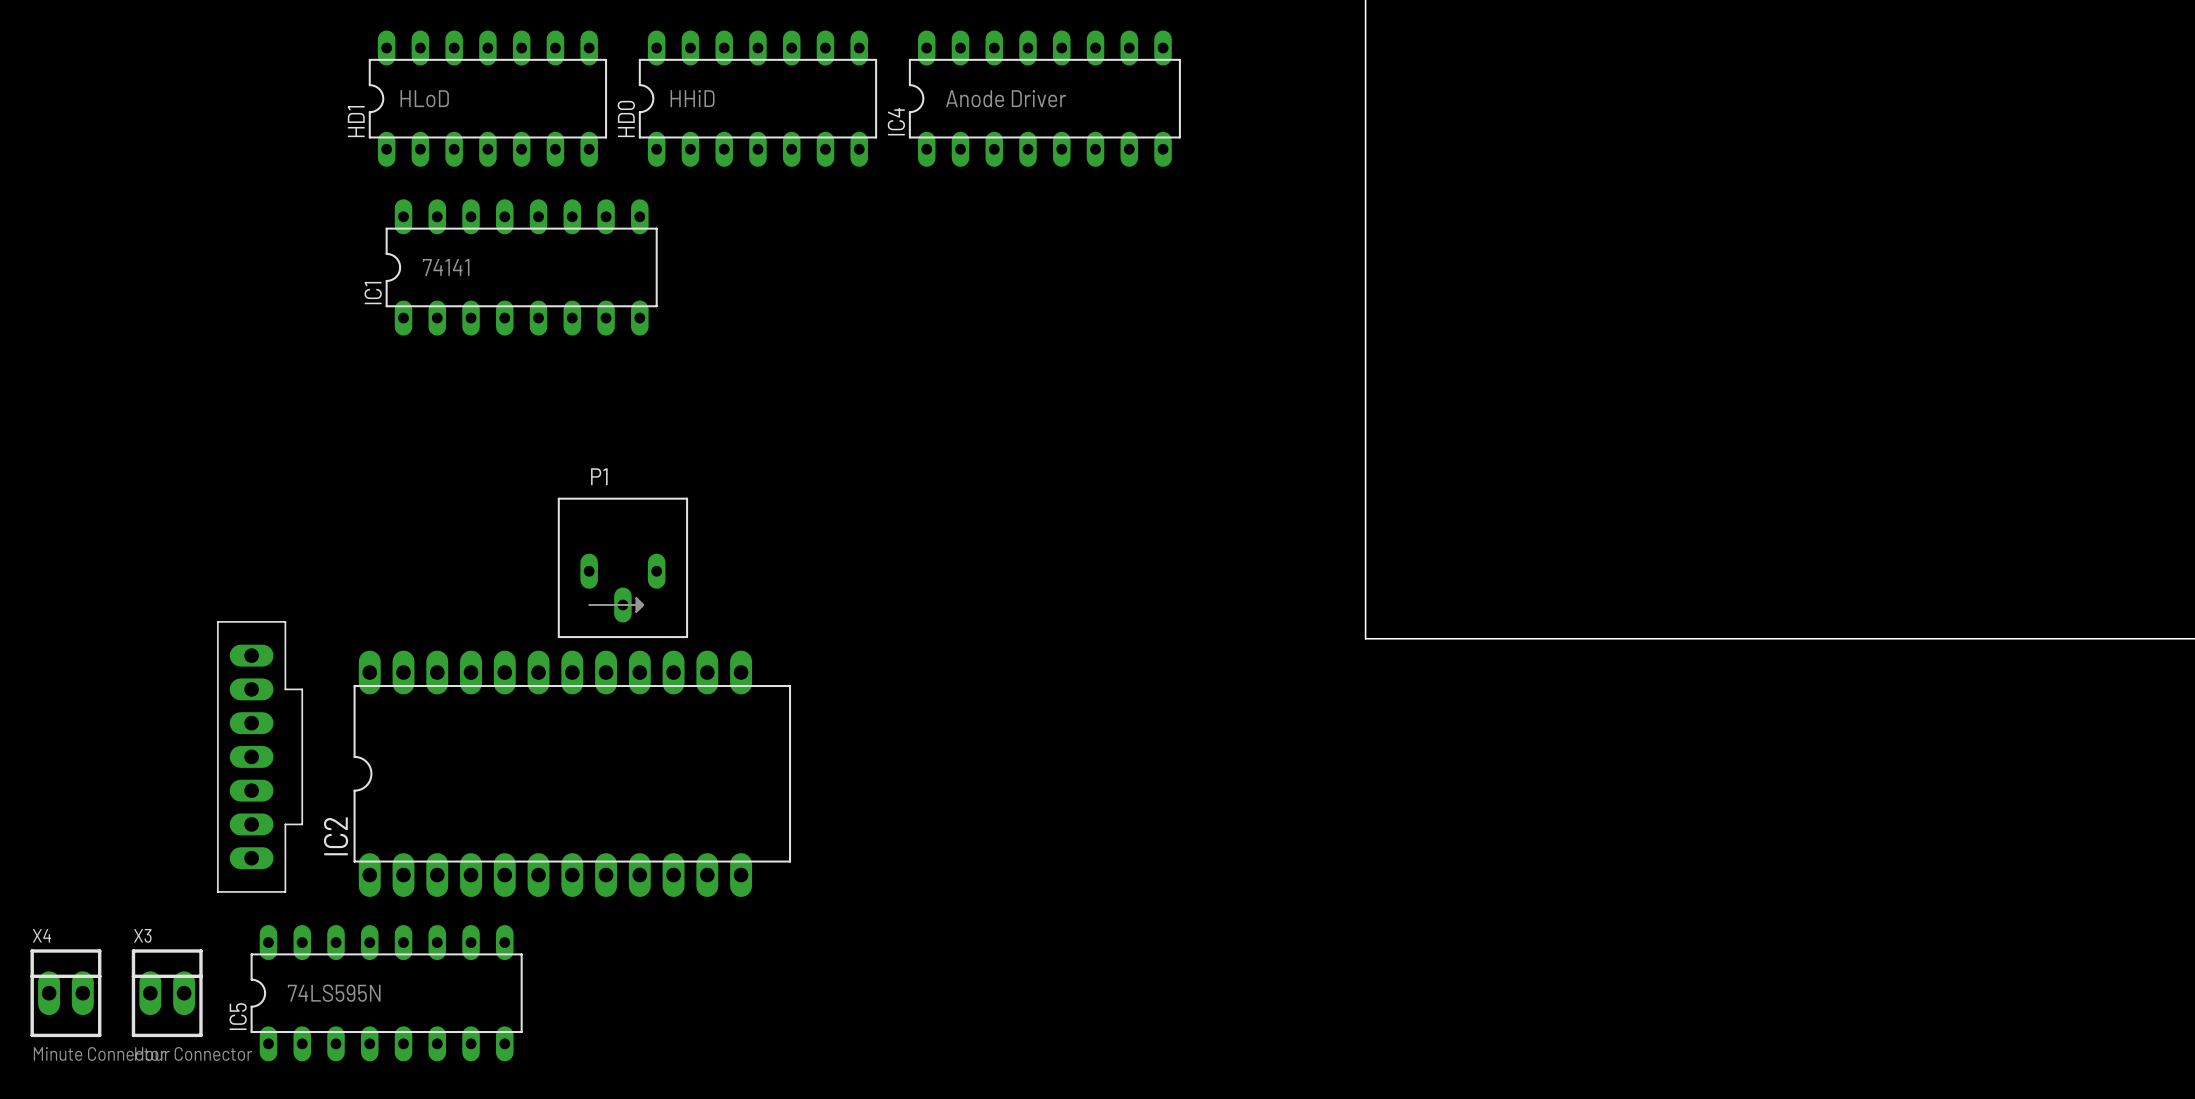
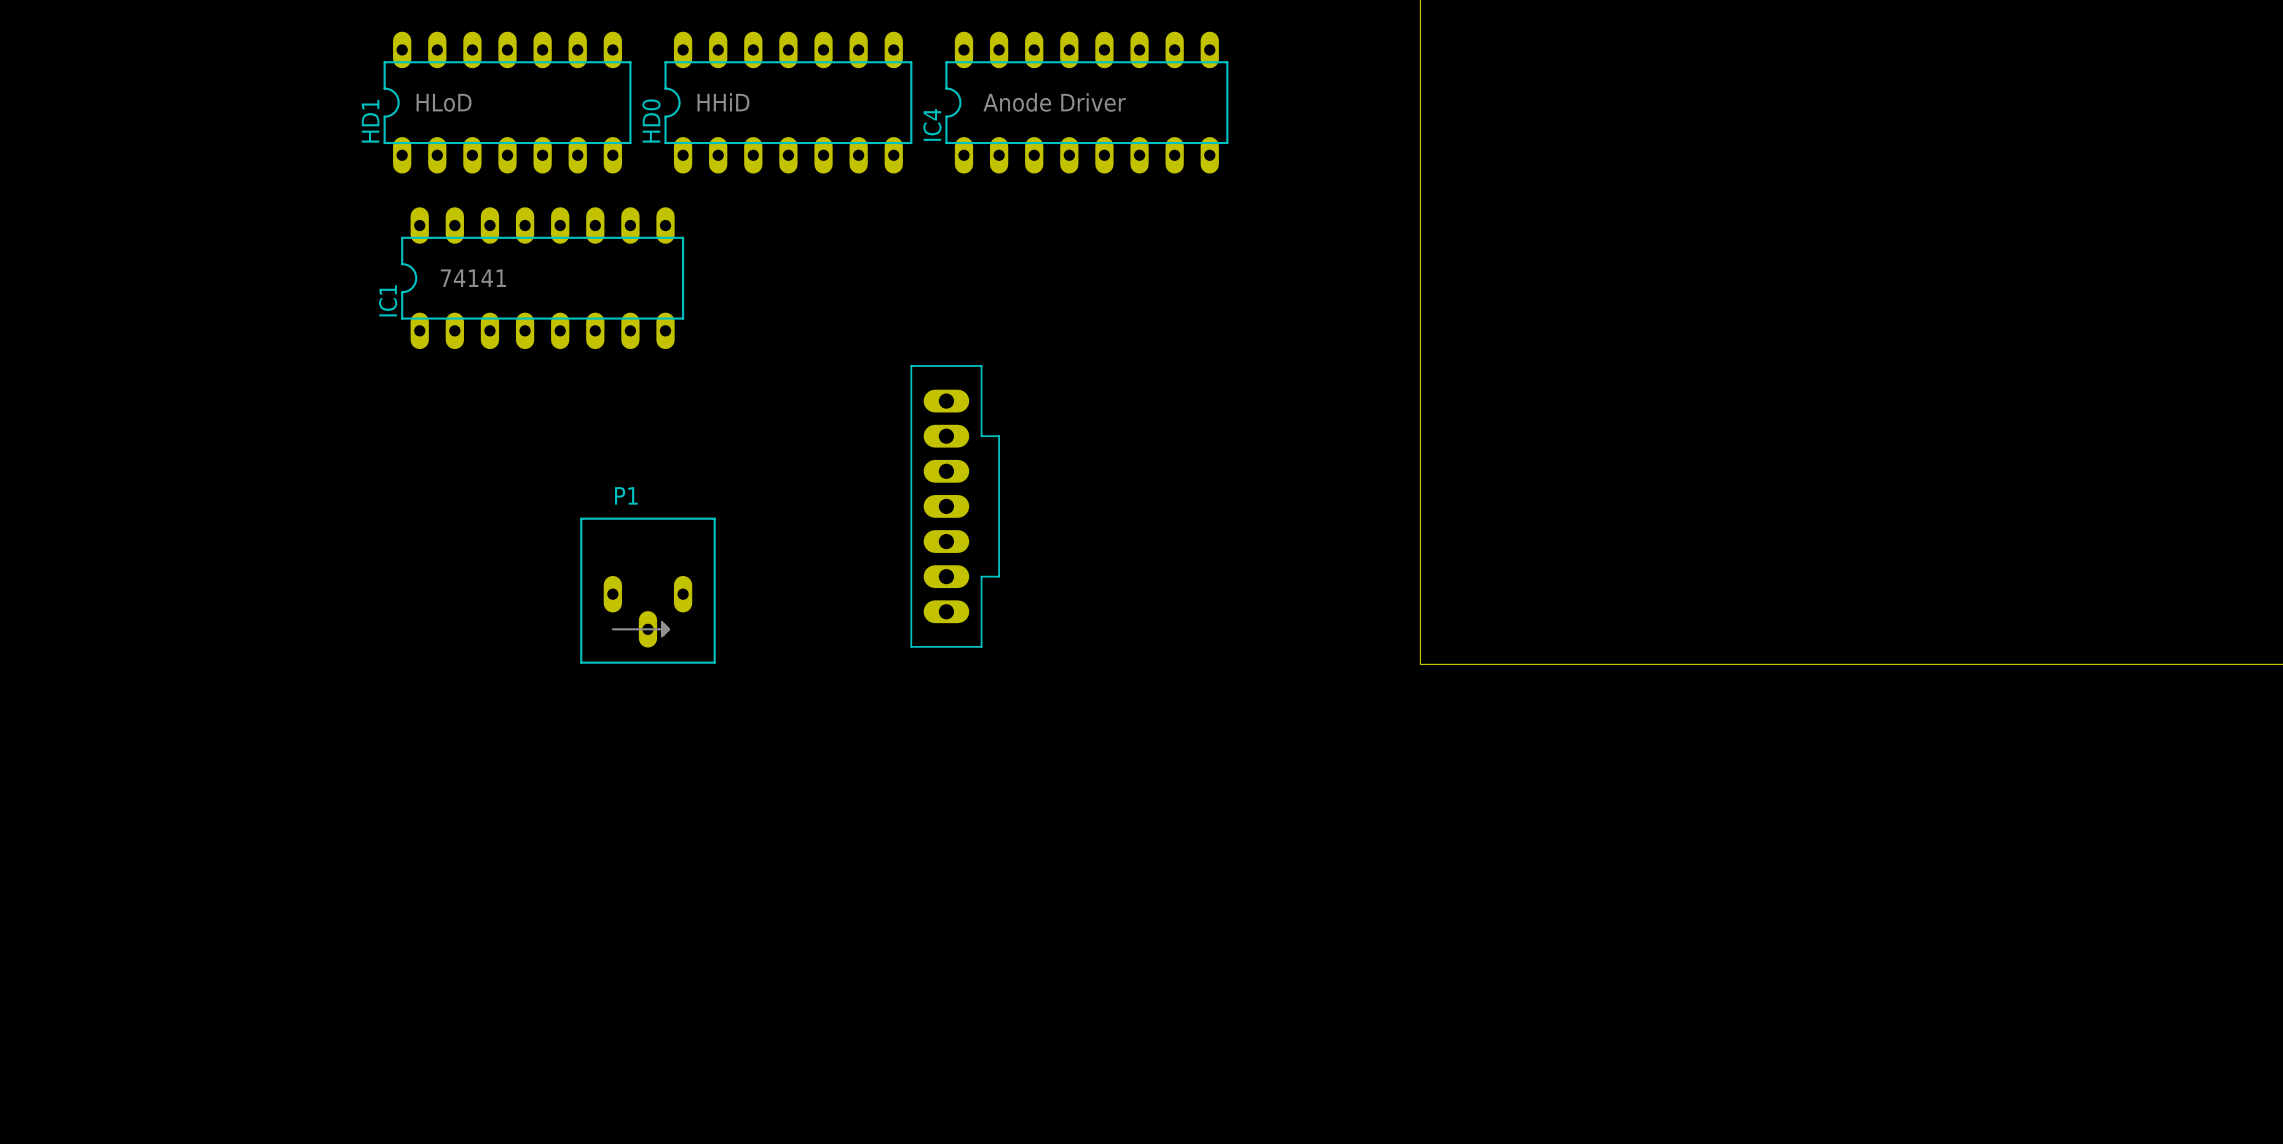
part: none -> (955, 506)
part: (260, 756) -> none
IC2: (572, 773) -> none
X4: Minute Connector (65, 993) -> none
X3: Hour Connector (167, 993) -> none
IC5: 74LS595N (386, 993) -> none

